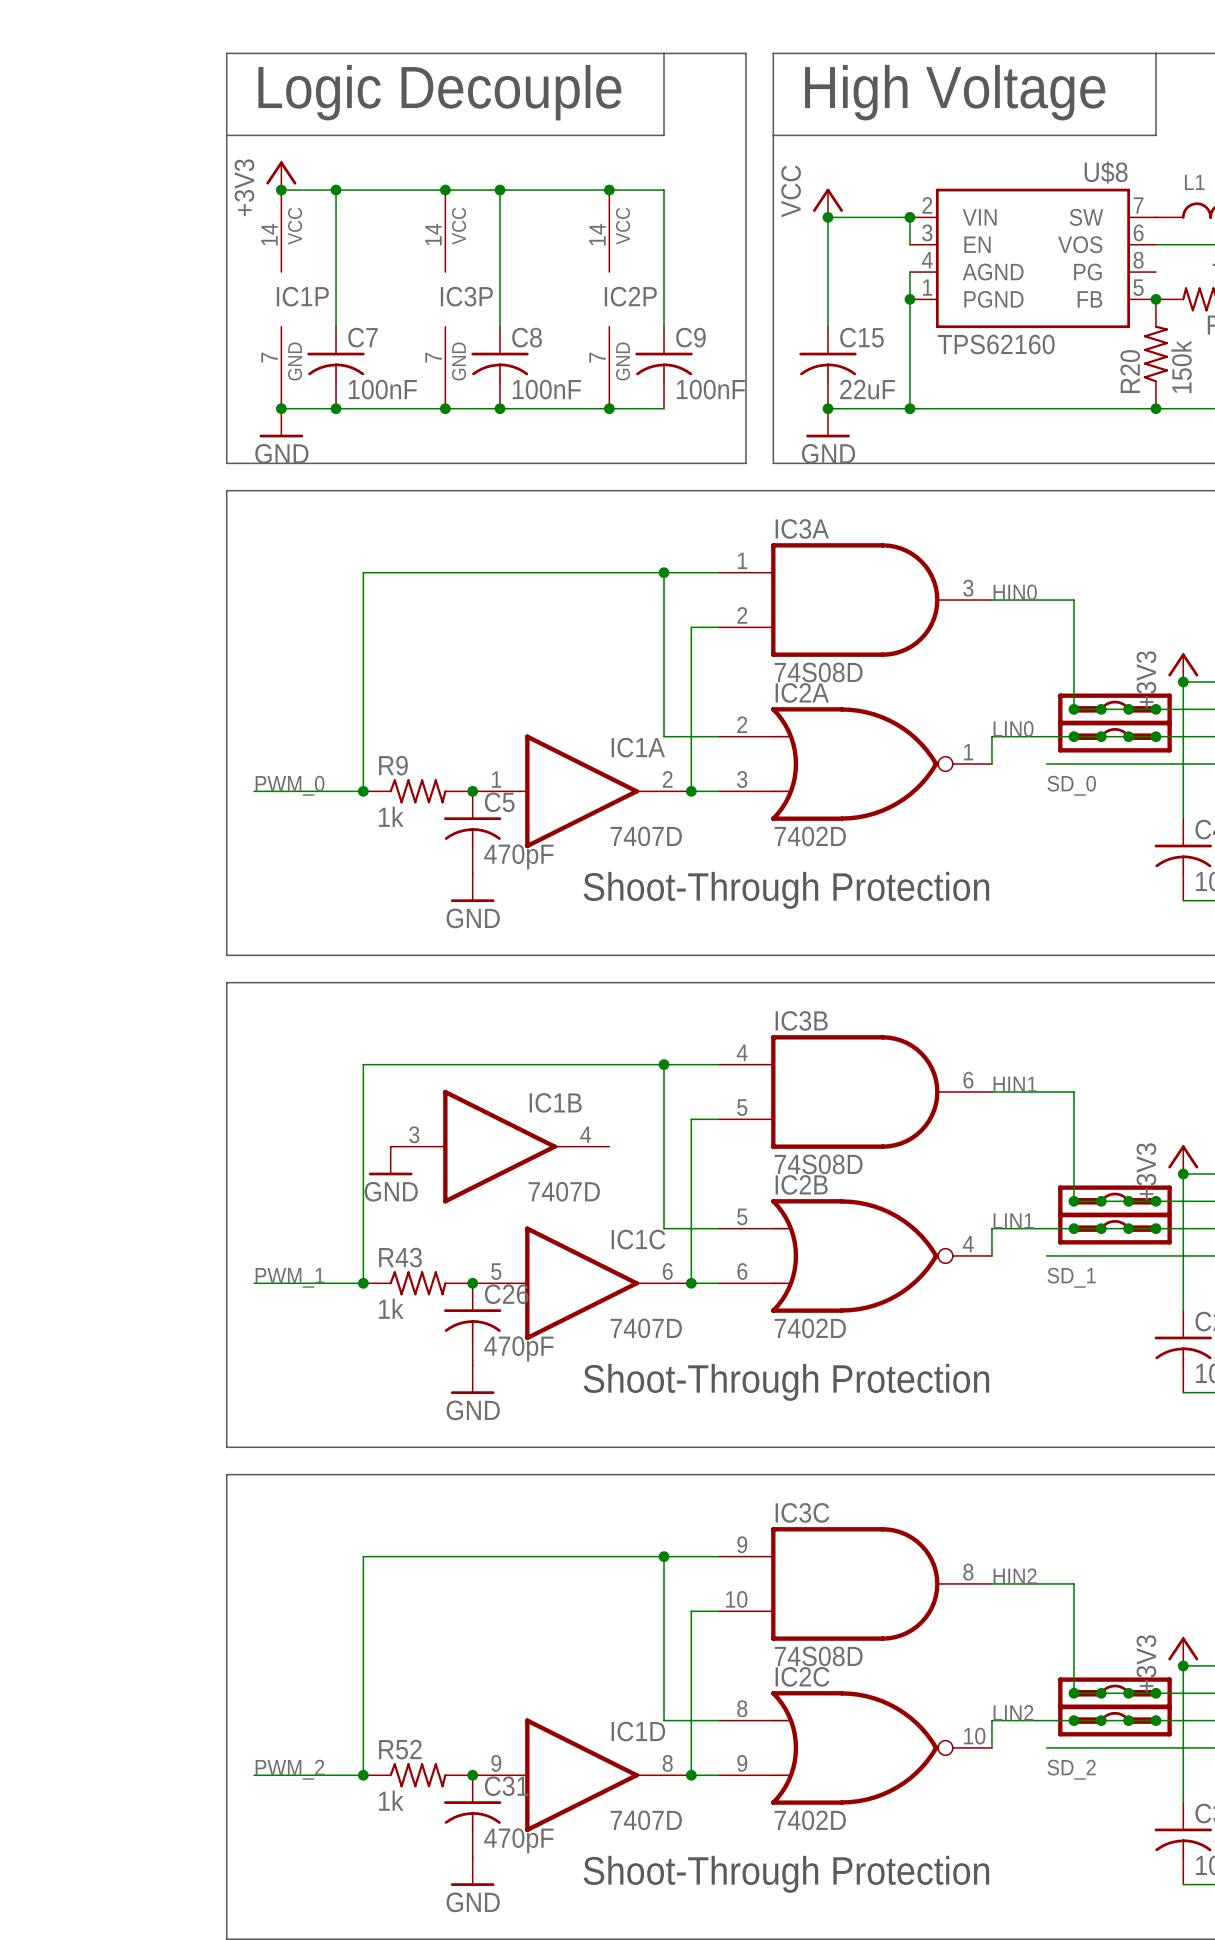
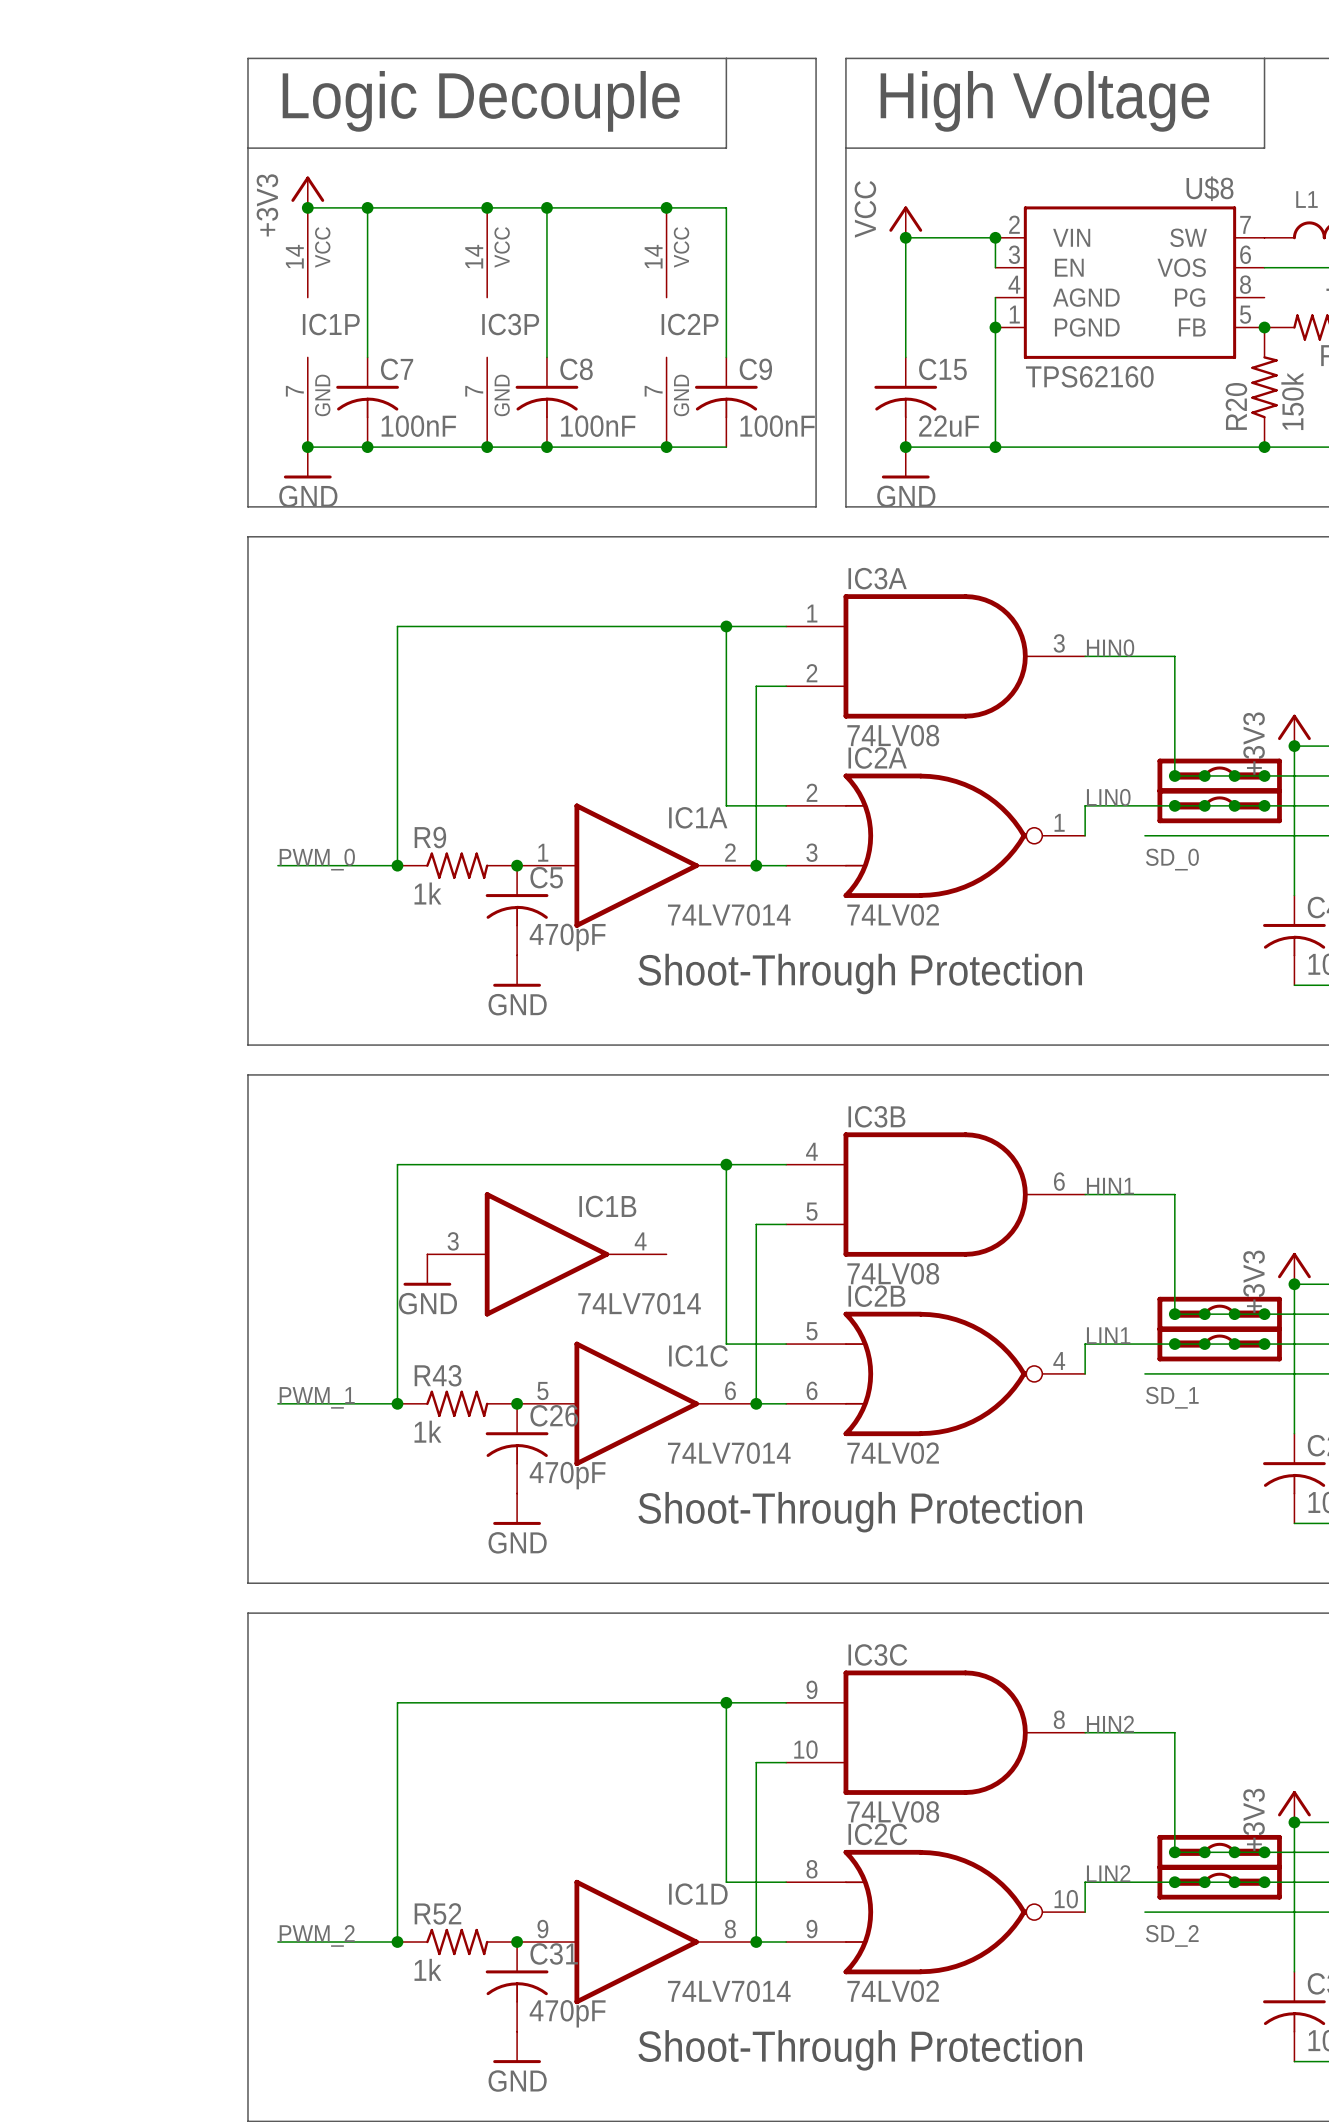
IC3A value: 74S08D (818, 672) -> 74LV08 (893, 735)
IC1A value: 7407D (646, 836) -> 74LV7014 (729, 914)
IC2A value: 7402D (810, 836) -> 74LV02 (893, 914)
IC3B value: 74S08D (818, 1164) -> 74LV08 (893, 1273)
IC1B value: 7407D (564, 1191) -> 74LV7014 (639, 1303)
IC1C value: 7407D (646, 1328) -> 74LV7014 (729, 1453)
IC2B value: 7402D (810, 1328) -> 74LV02 (893, 1453)
IC3C value: 74S08D (818, 1656) -> 74LV08 (893, 1811)
IC1D value: 7407D (646, 1820) -> 74LV7014 (729, 1991)
IC2C value: 7402D (810, 1820) -> 74LV02 (893, 1991)

